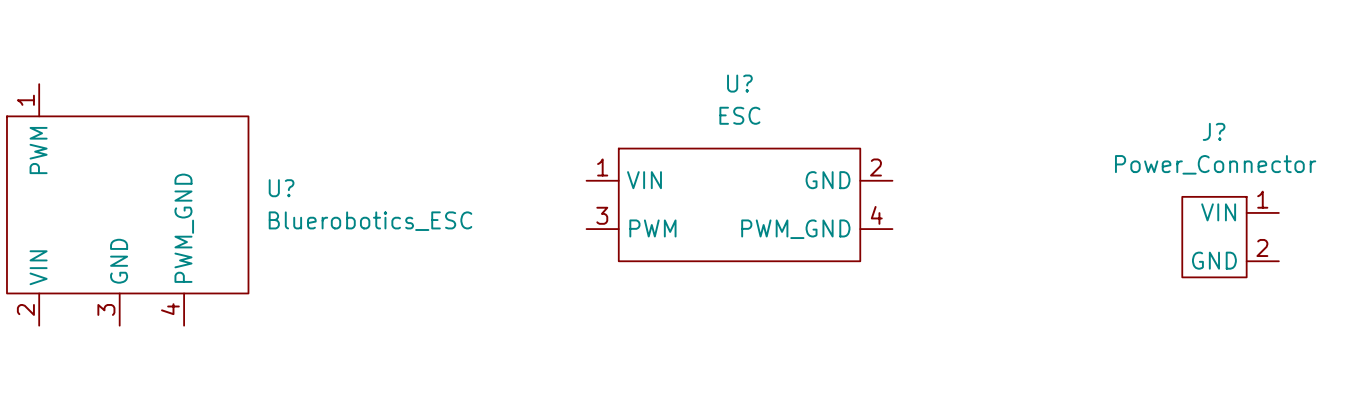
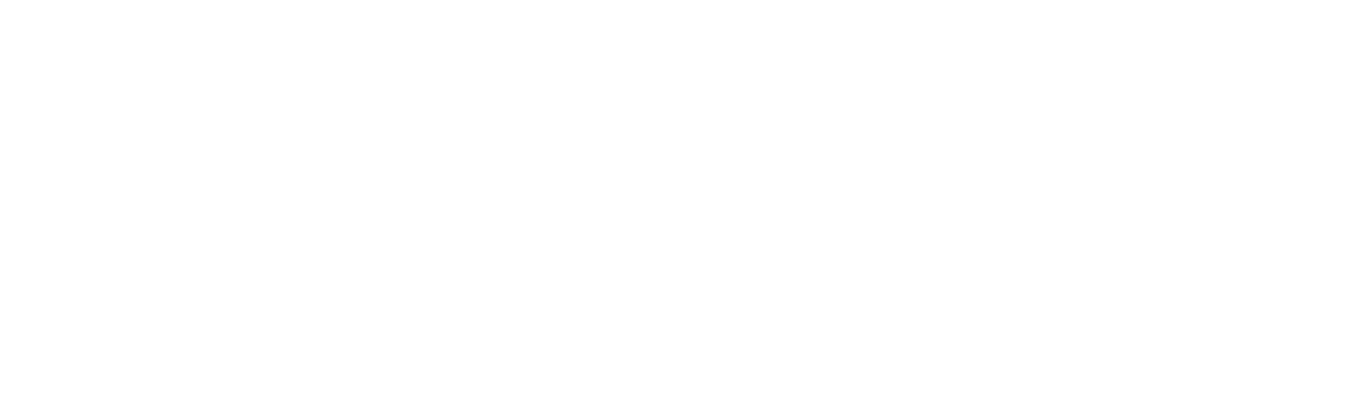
U?: Bluerobotics_ESC (127, 204) -> none
U?: ESC (739, 204) -> none
J?: Power_Connector (1230, 237) -> none

